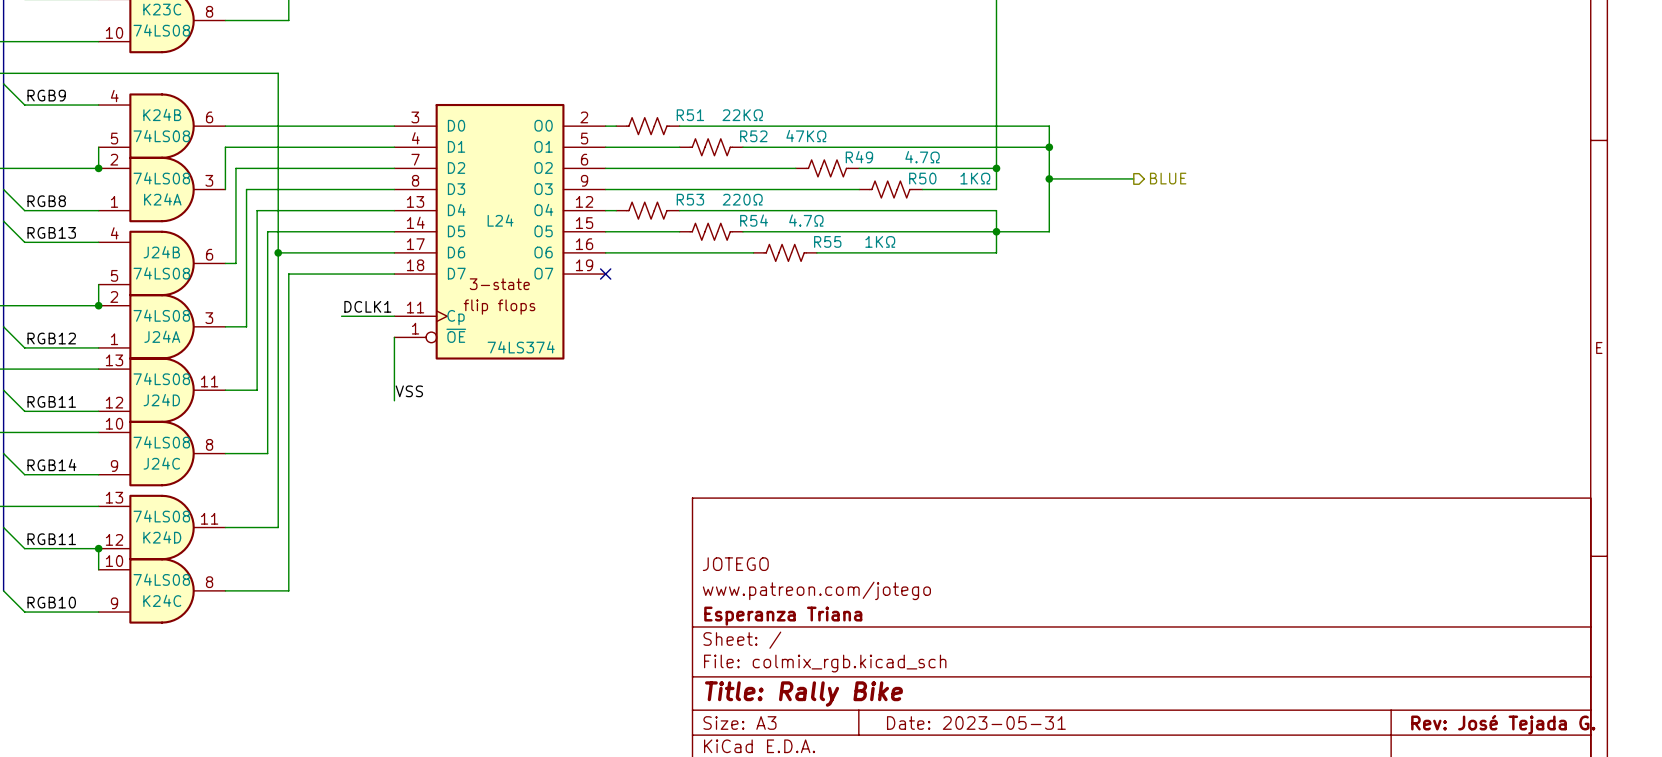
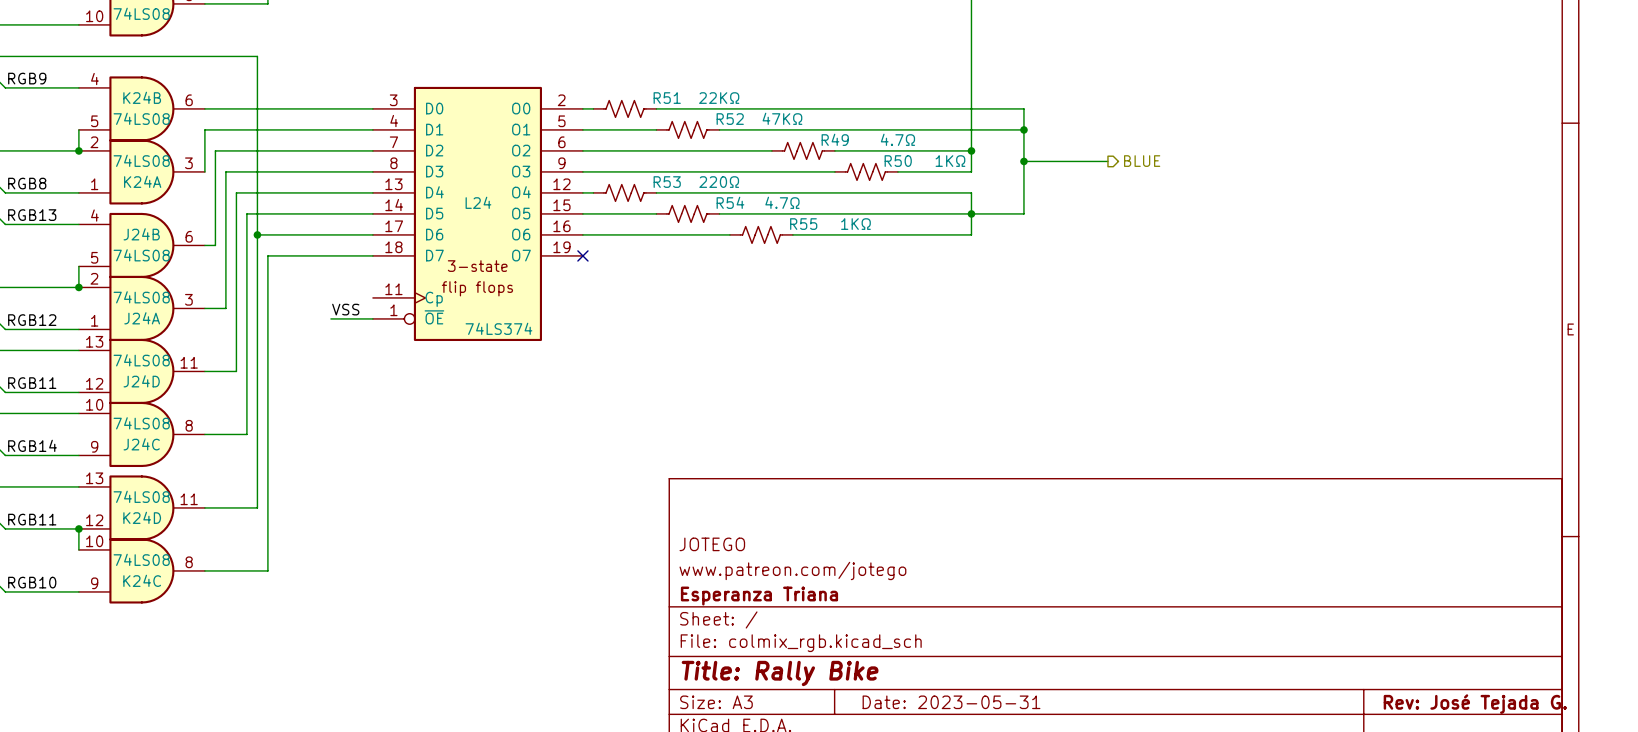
label: DCLK1 (367, 306) -> none
wire: (341, 316) (394, 316) -> none
wire: (394, 337) (394, 400) -> (372, 318) (330, 318)
label position: VSS (409, 391) -> VSS (345, 309)

